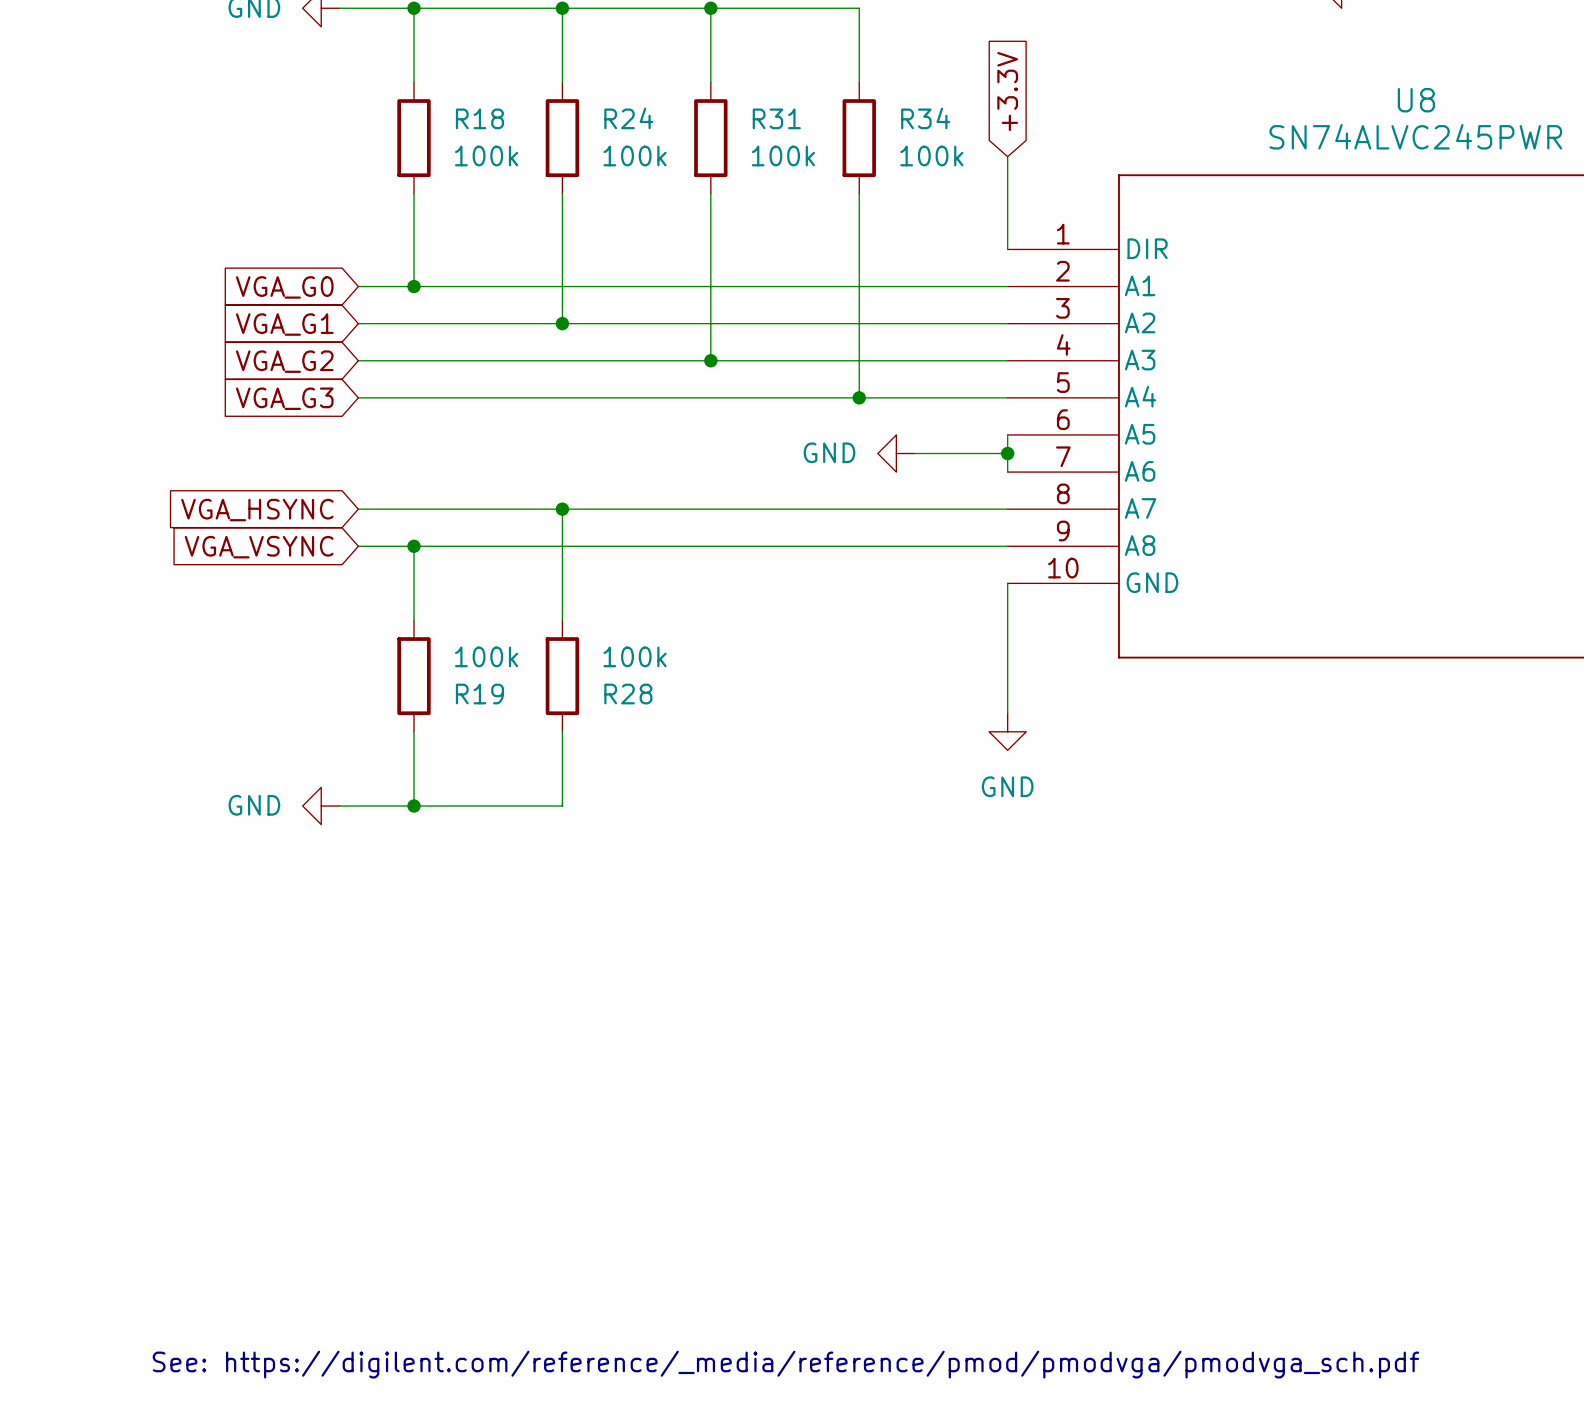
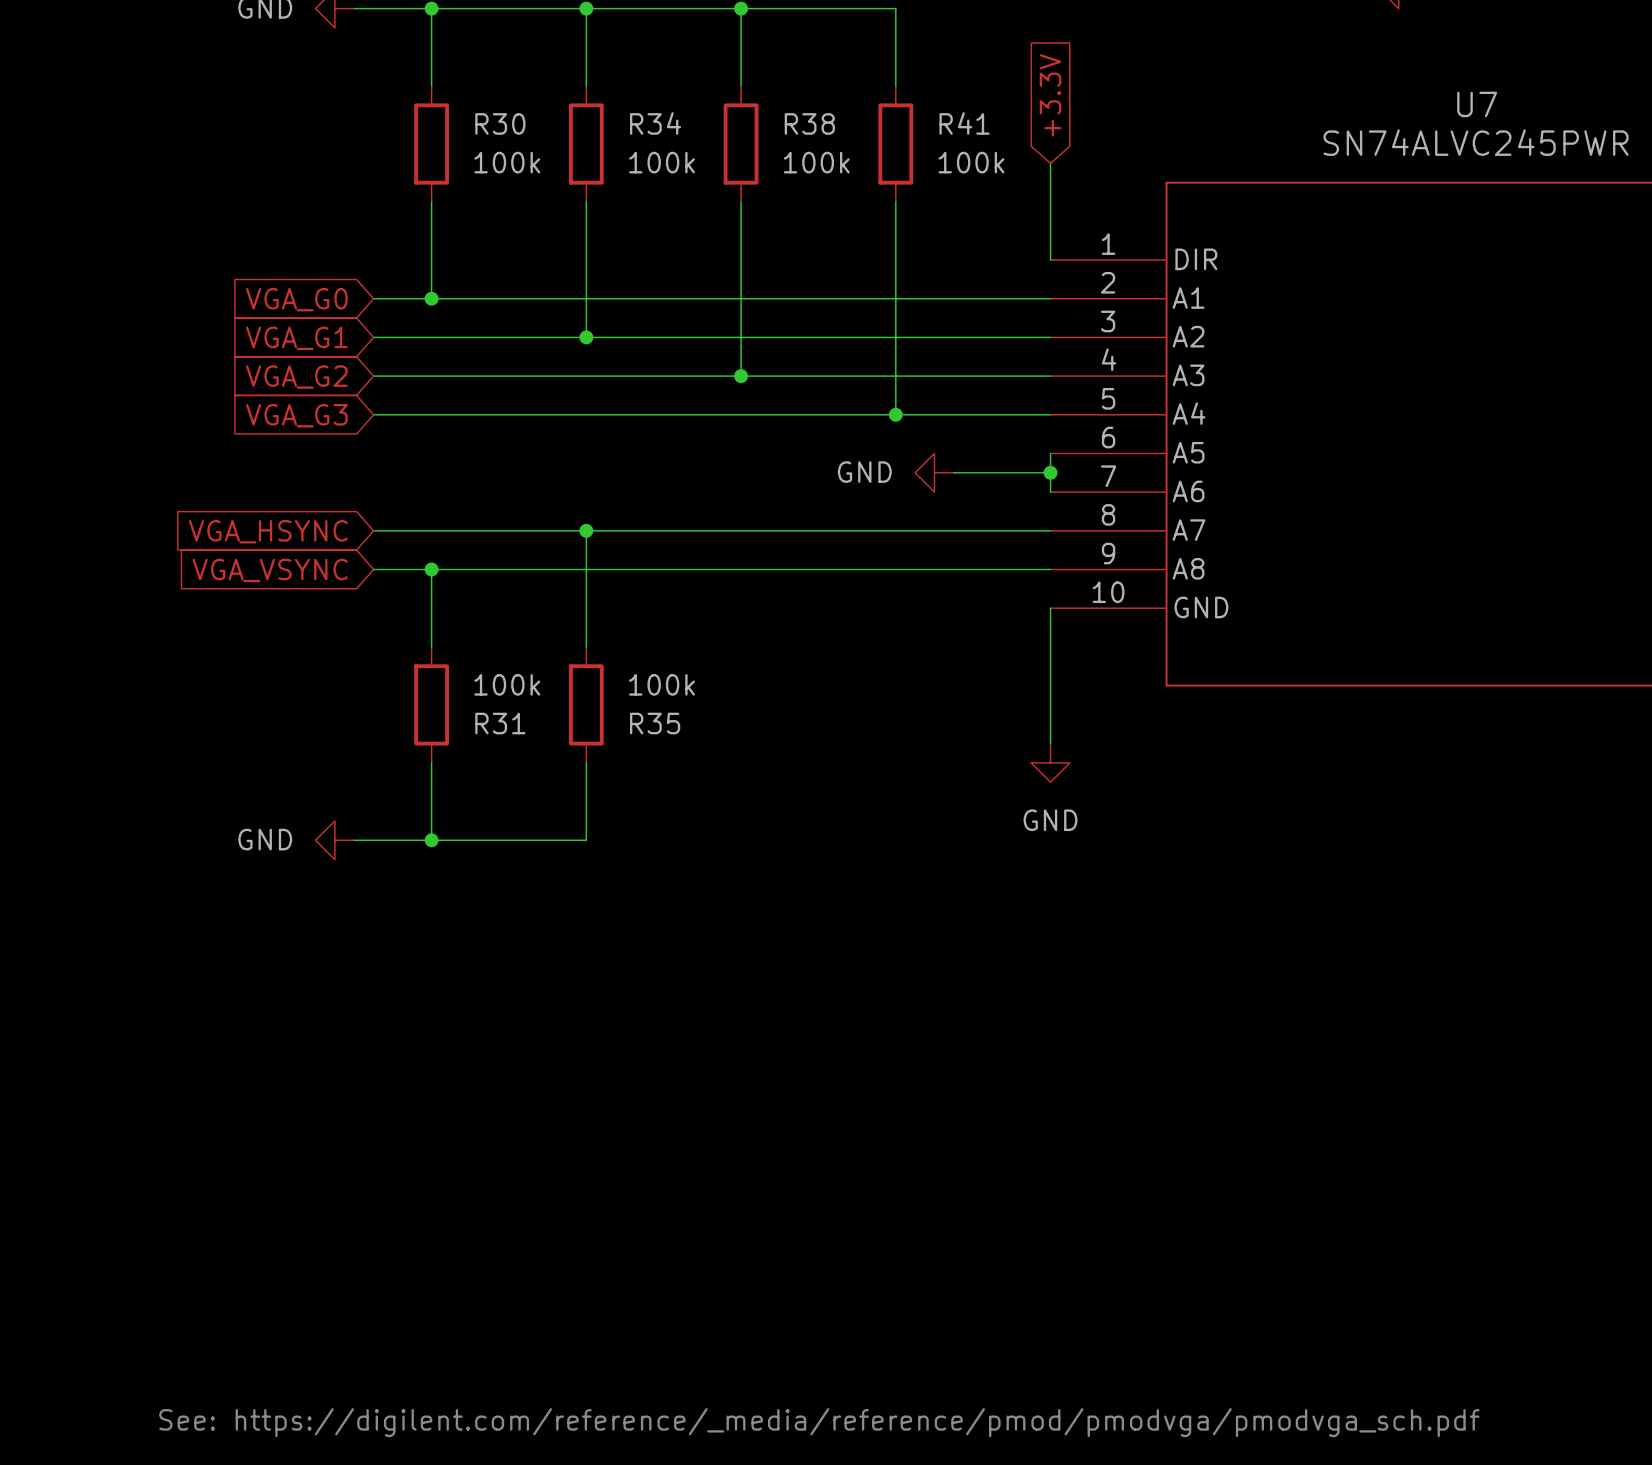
U8 name: U8 (1416, 100) -> U7 (1477, 104)
R18 name: R18 (479, 118) -> R30 (500, 123)
R24 name: R24 (628, 118) -> R34 (655, 123)
R31 name: R31 (776, 118) -> R38 (809, 123)
R34 name: R34 (925, 118) -> R41 (964, 123)
R19 name: R19 (479, 694) -> R31 (500, 723)
R28 name: R28 (628, 694) -> R35 (655, 723)

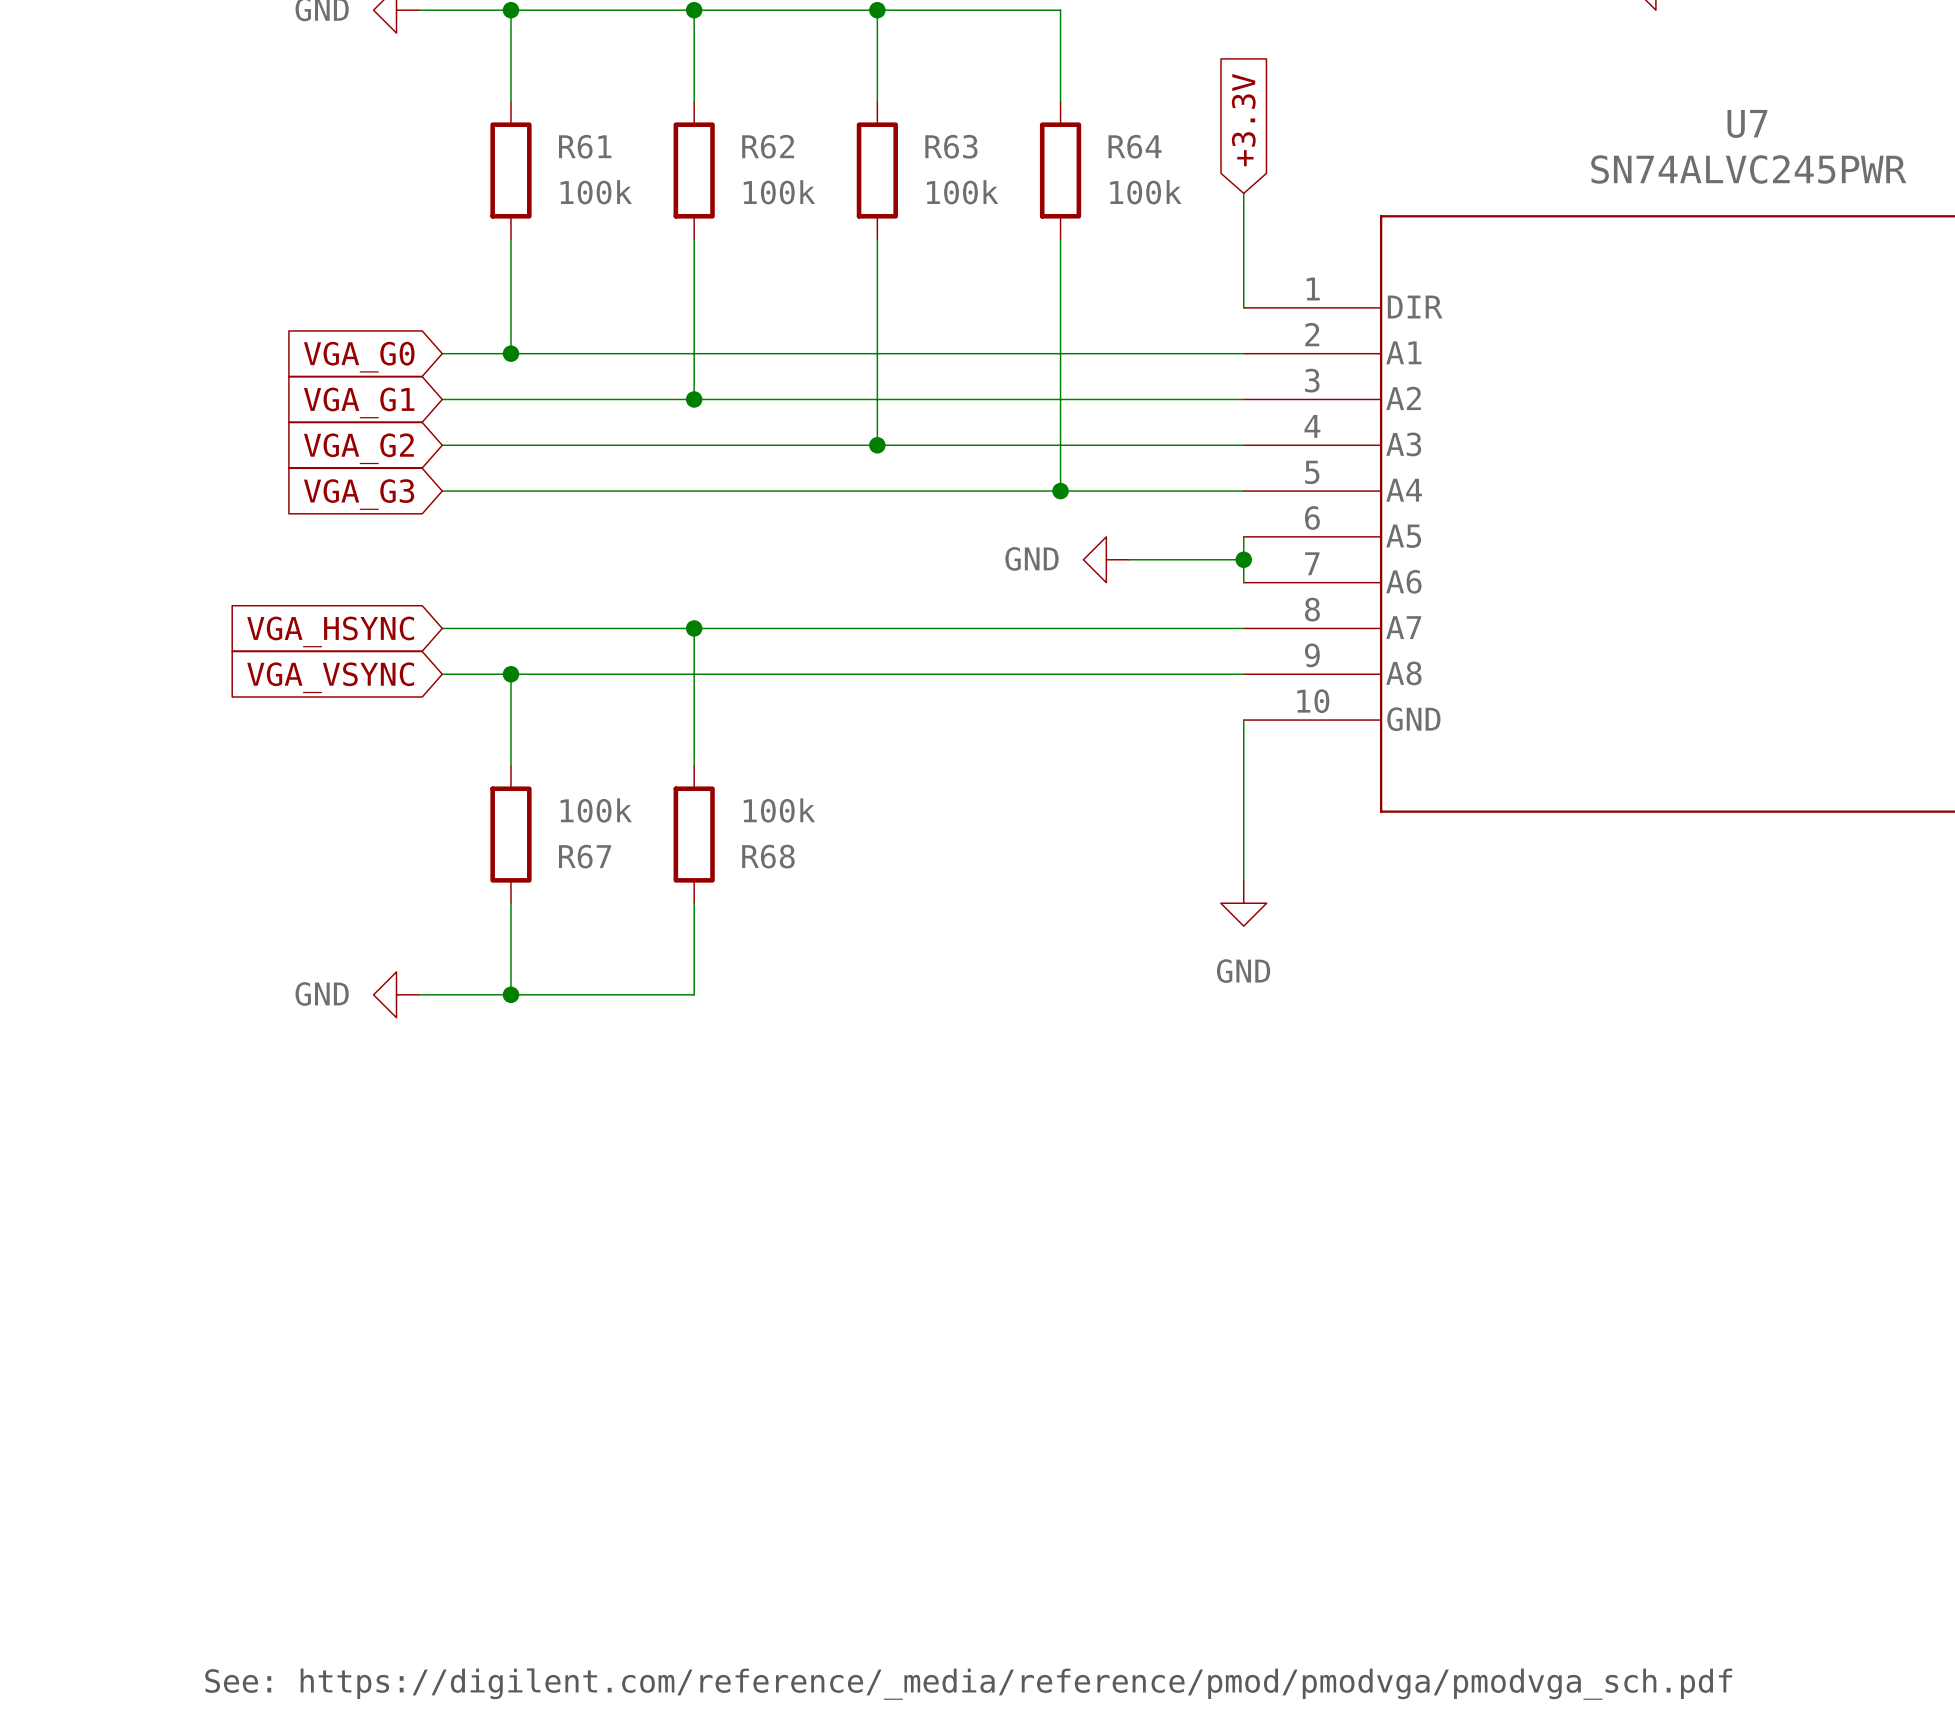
R30 name: R30 (500, 123) -> R61 (585, 146)
R34 name: R34 (655, 123) -> R62 (768, 146)
R38 name: R38 (809, 123) -> R63 (951, 146)
R41 name: R41 (964, 123) -> R64 (1135, 146)
R31 name: R31 (500, 723) -> R67 (585, 856)
R35 name: R35 (655, 723) -> R68 (768, 856)

